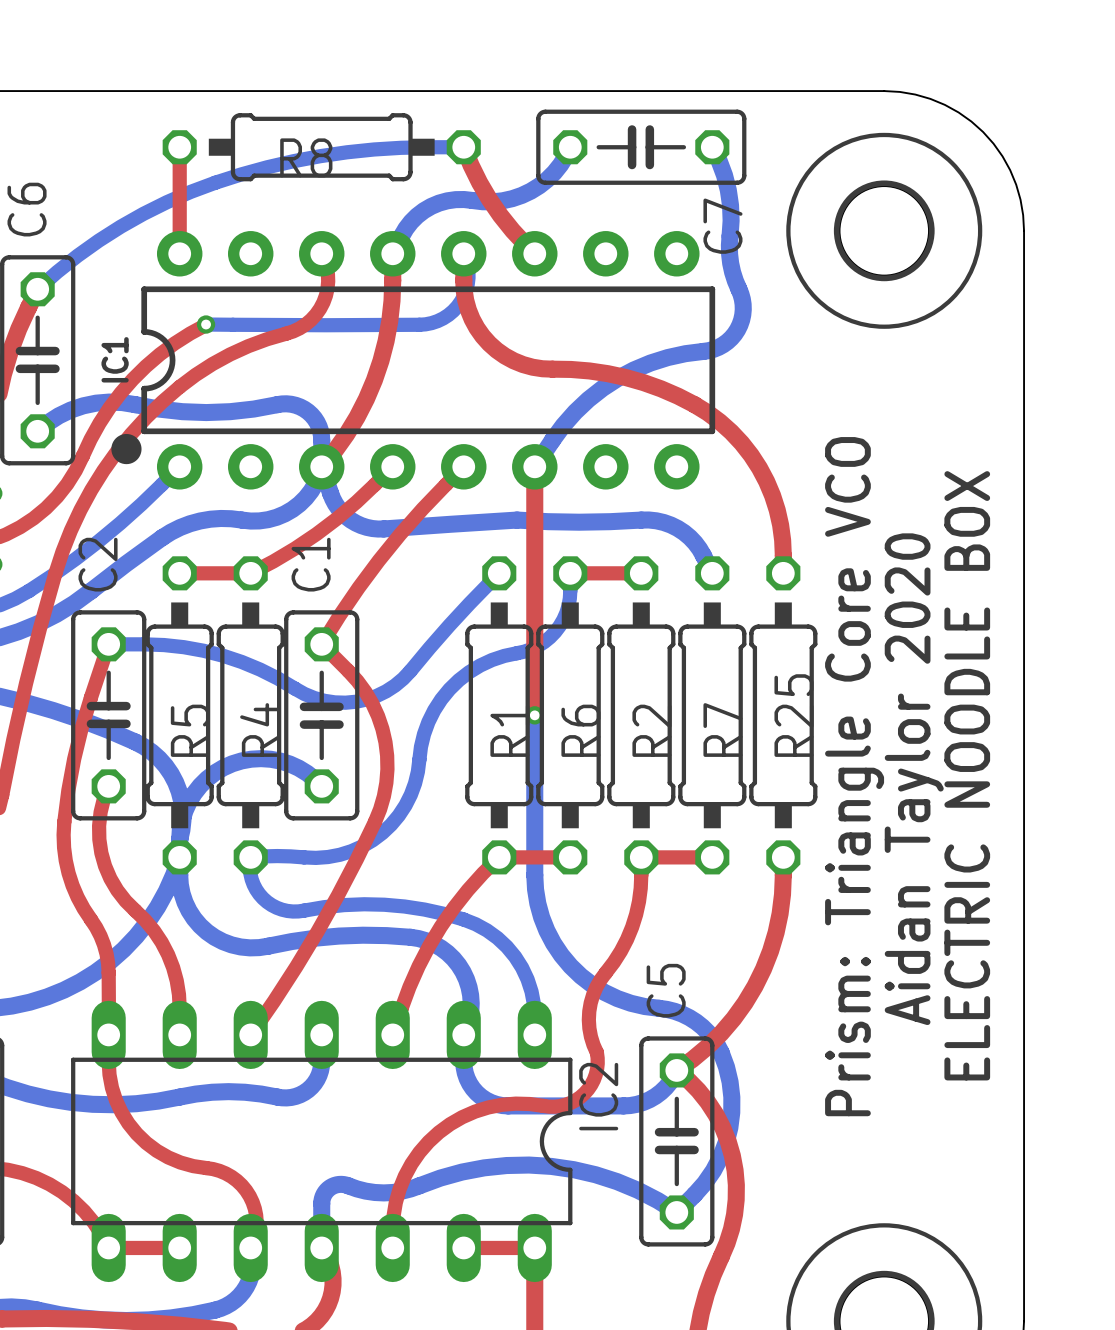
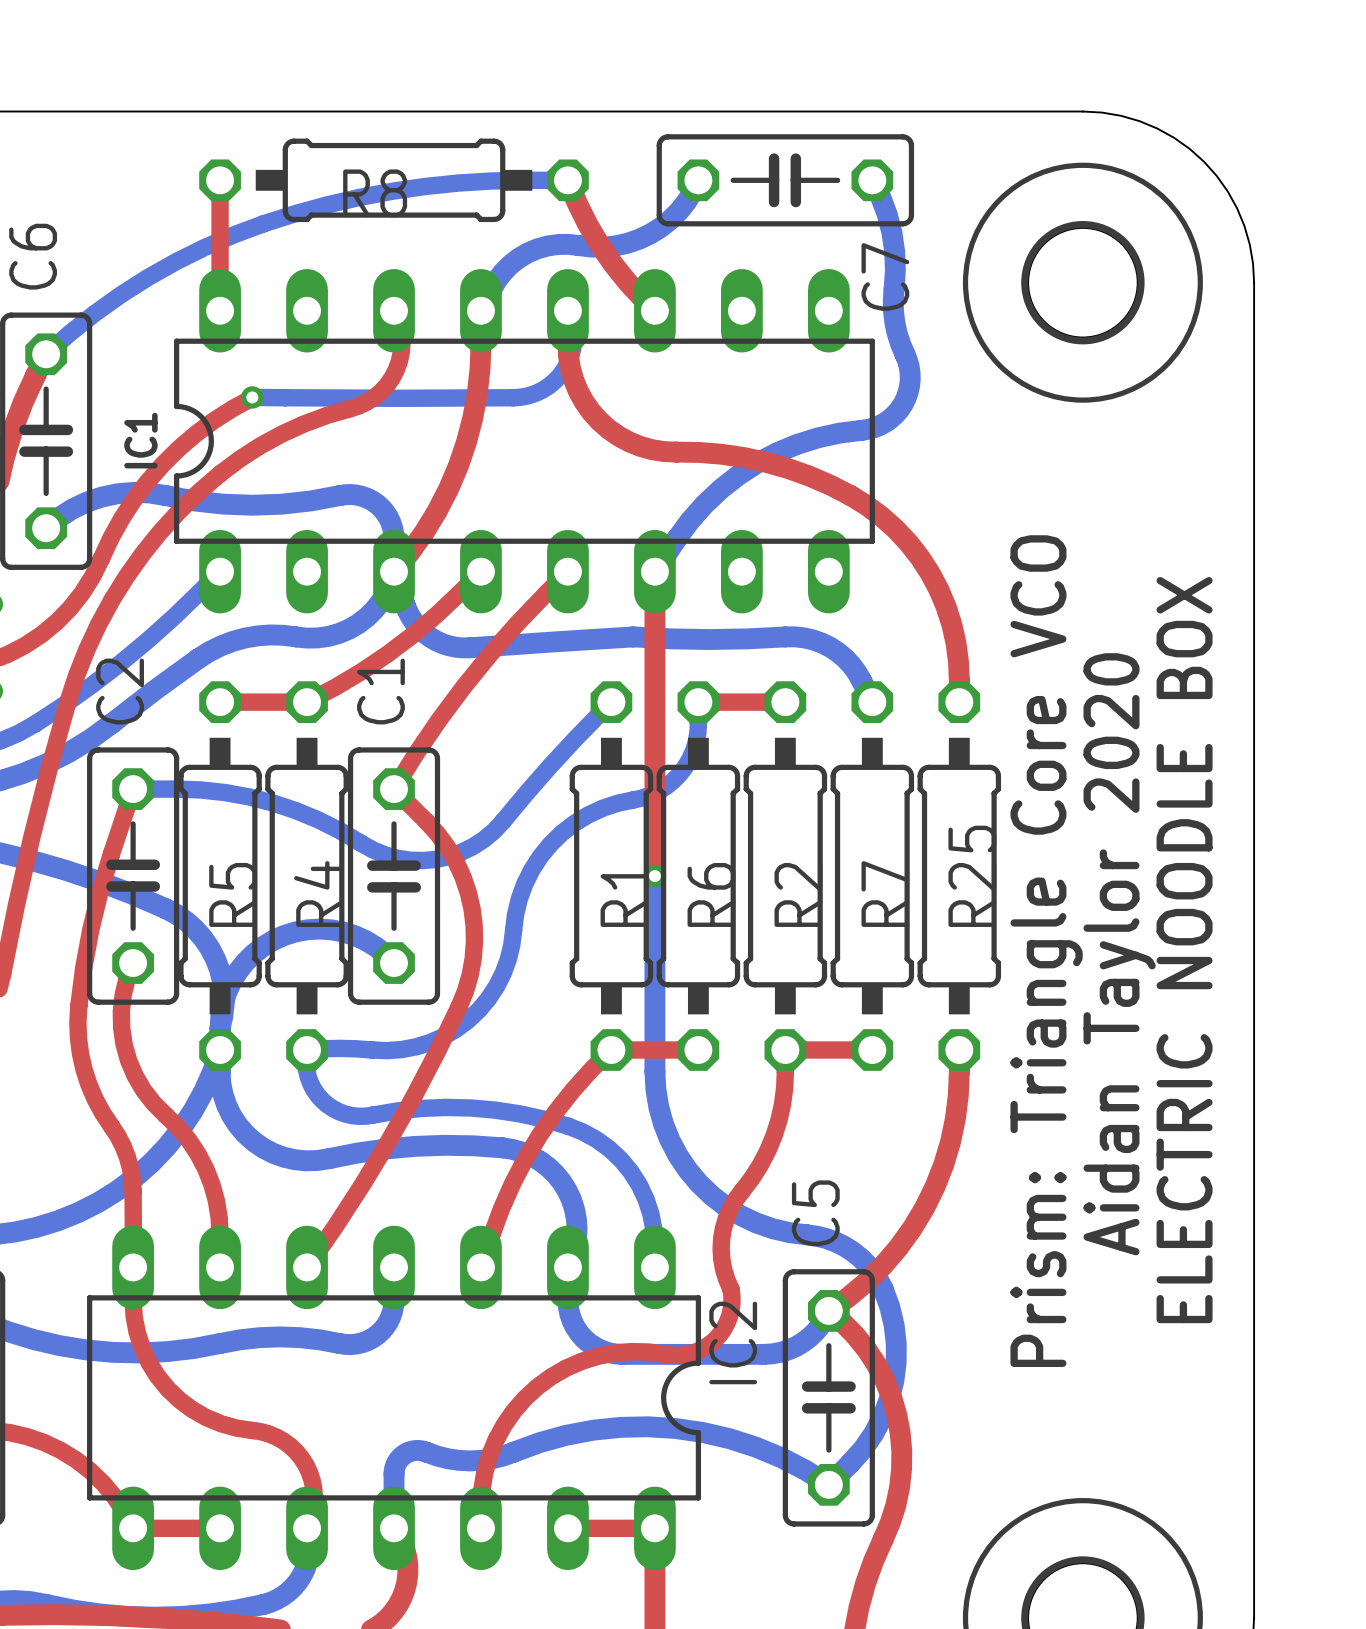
IC1 footprint: [111, 231, 716, 490] -> [173, 269, 875, 614]

